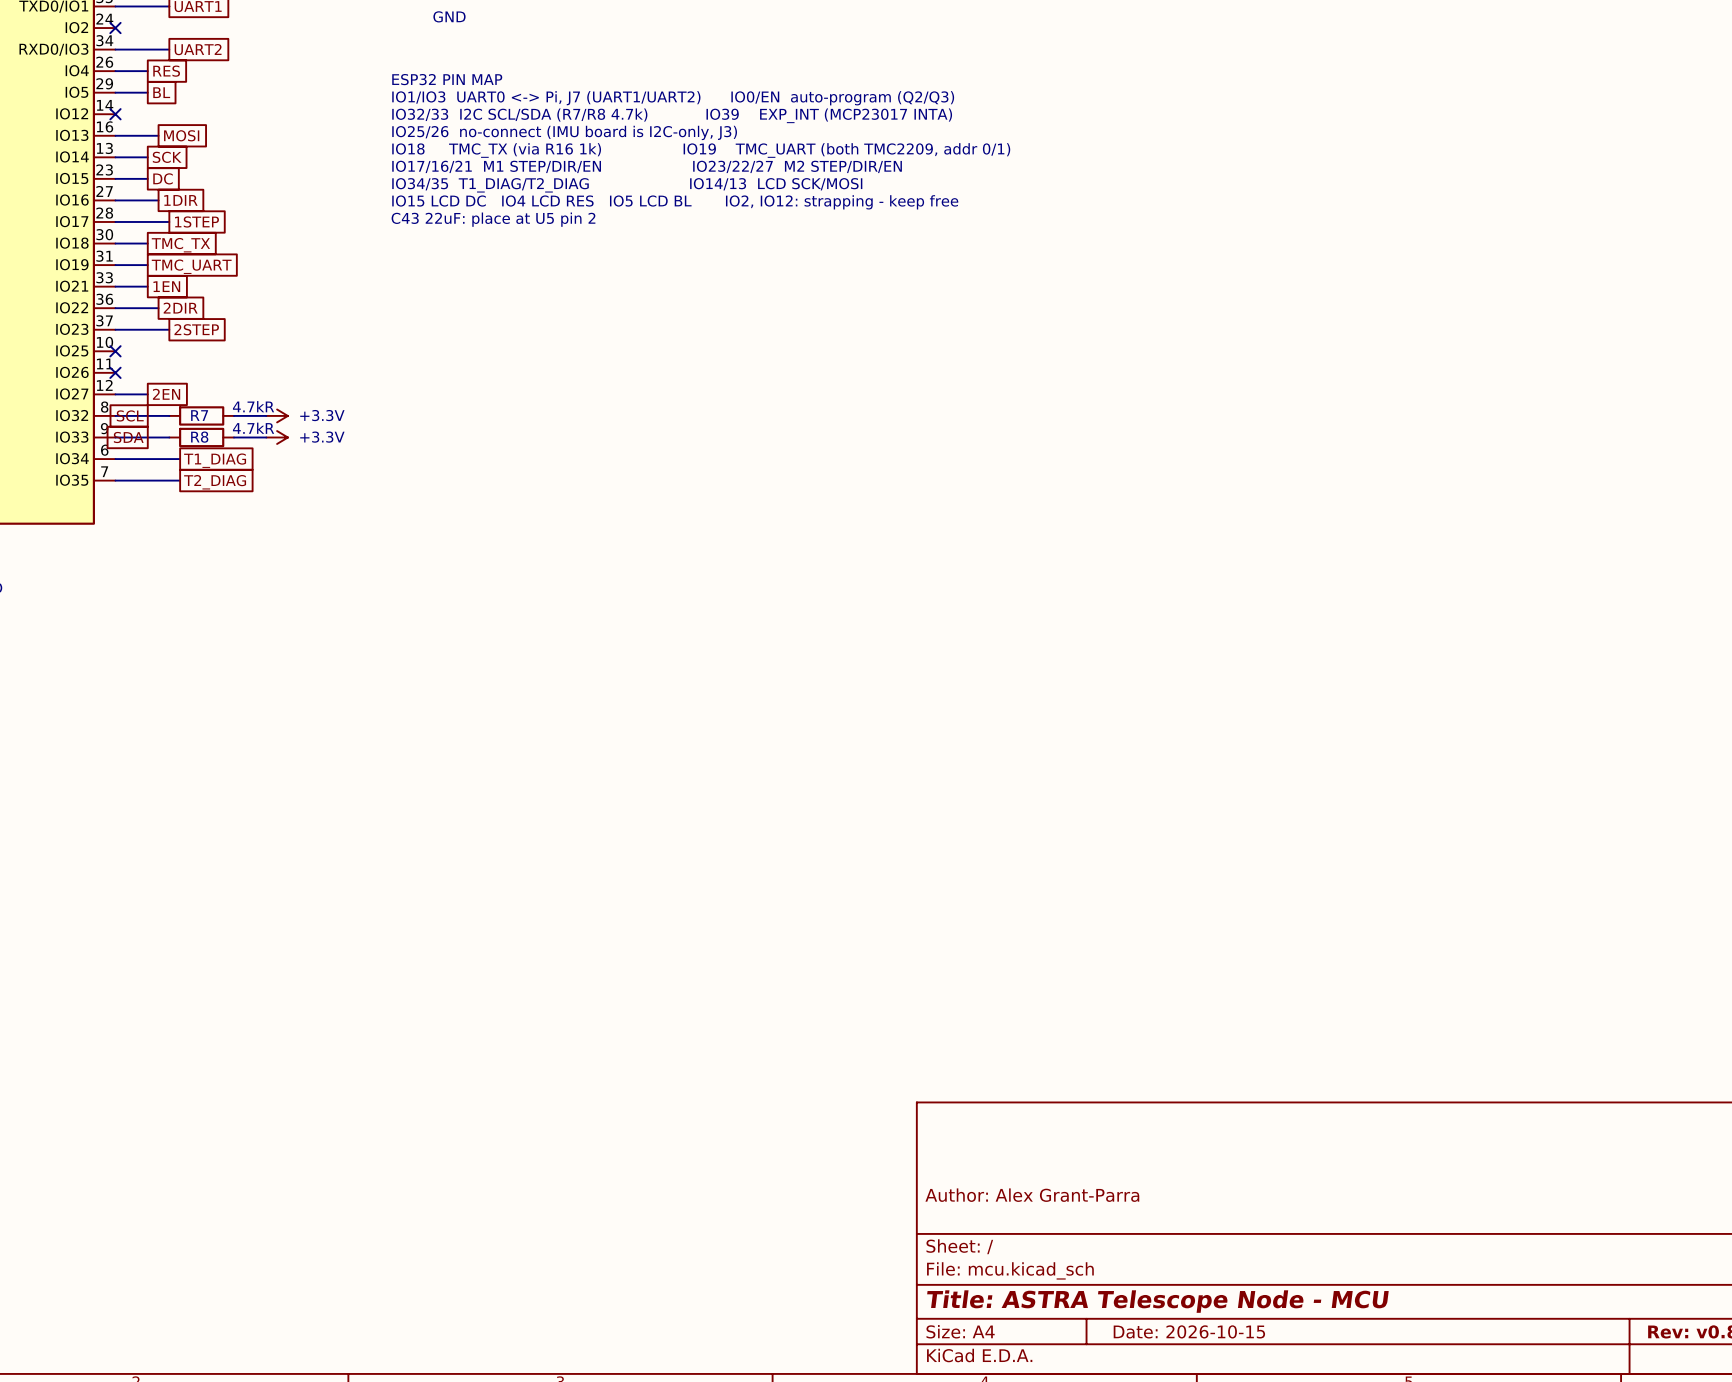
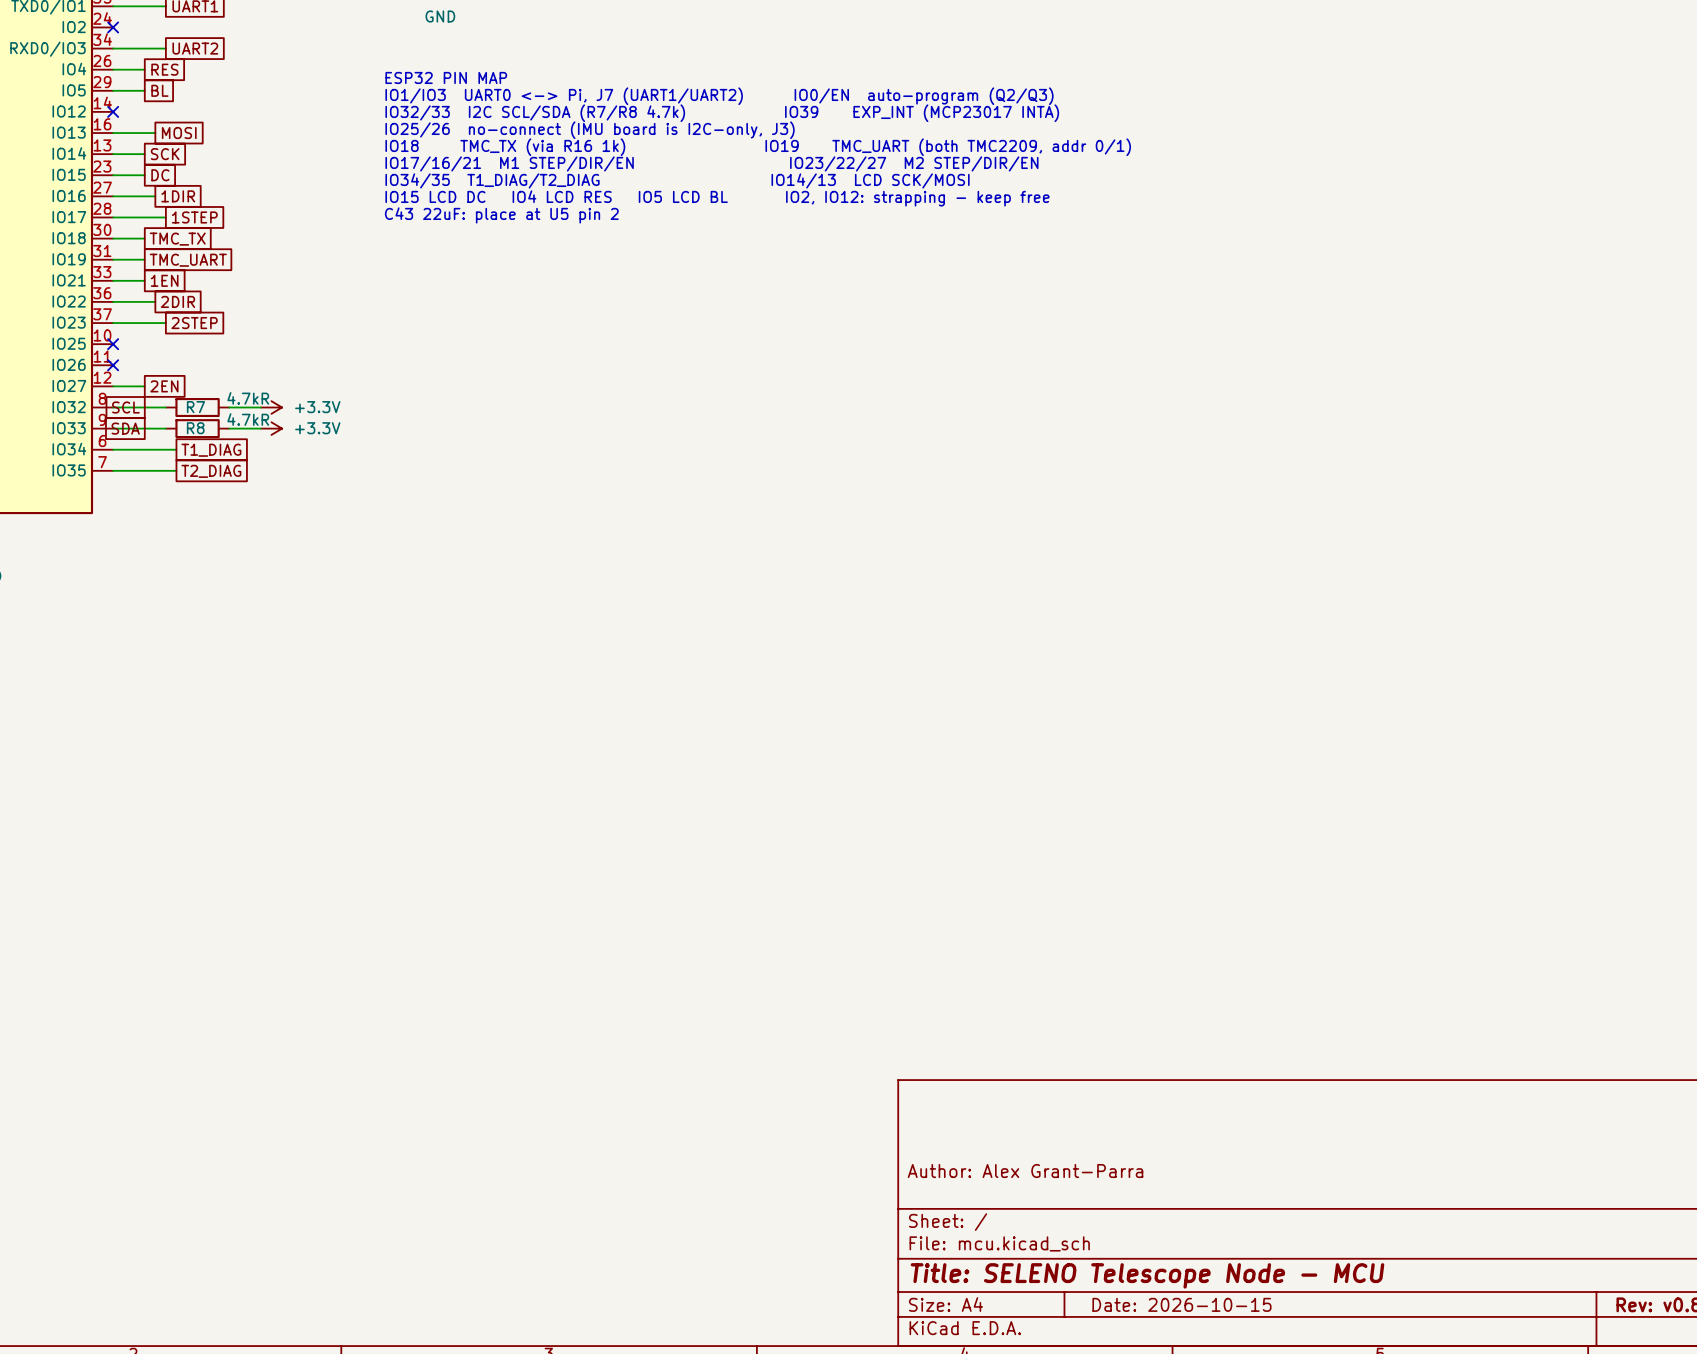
title block: Title: ASTRA Telescope Node - MCU (1157, 1301) -> Title: SELENO Telescope Node - MCU (1147, 1275)

